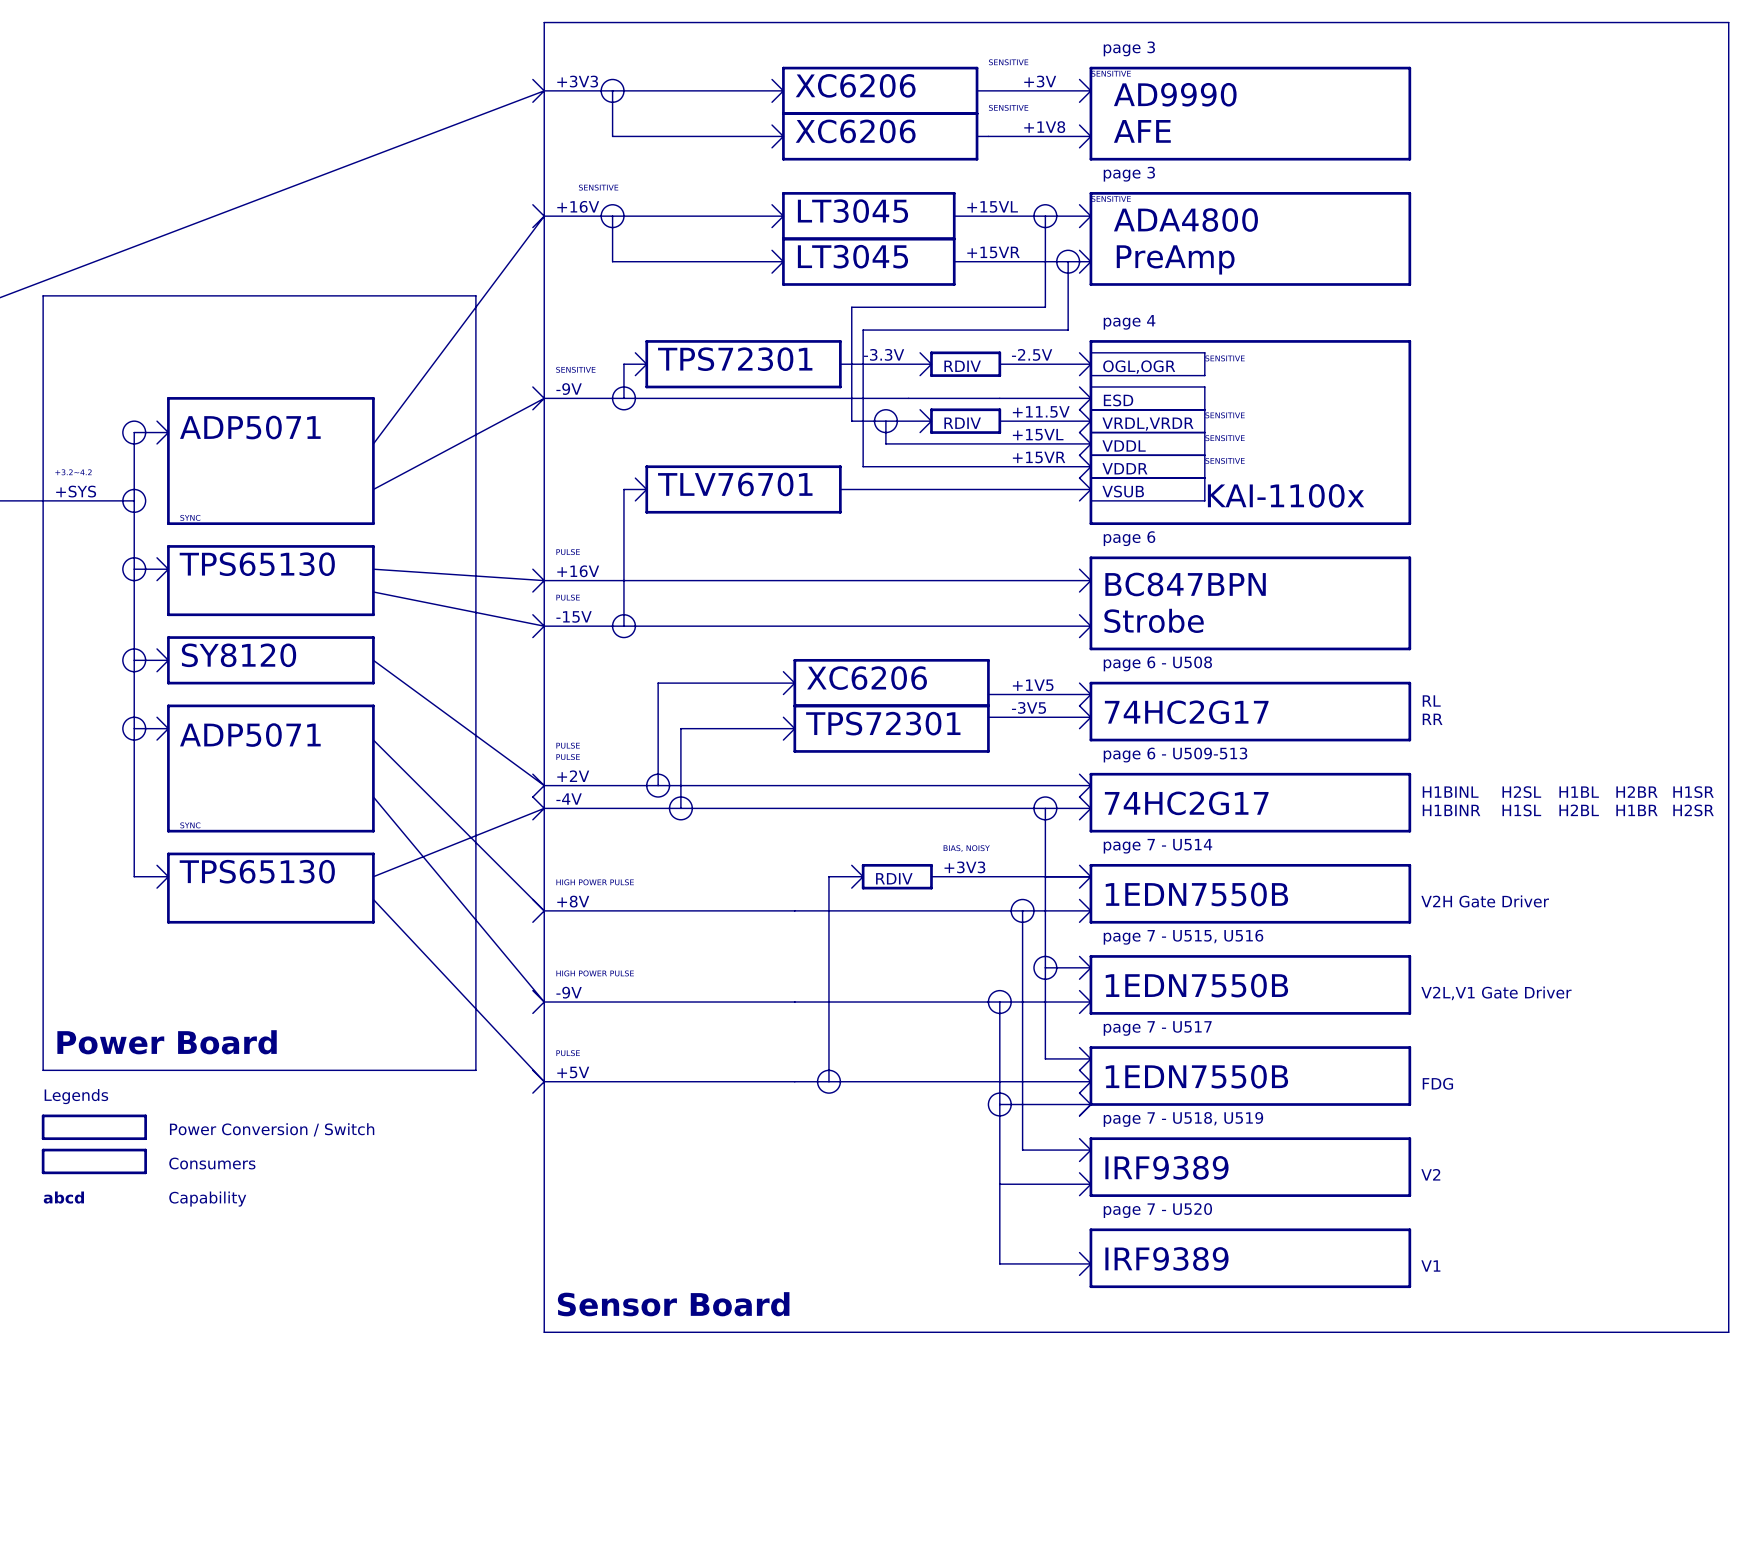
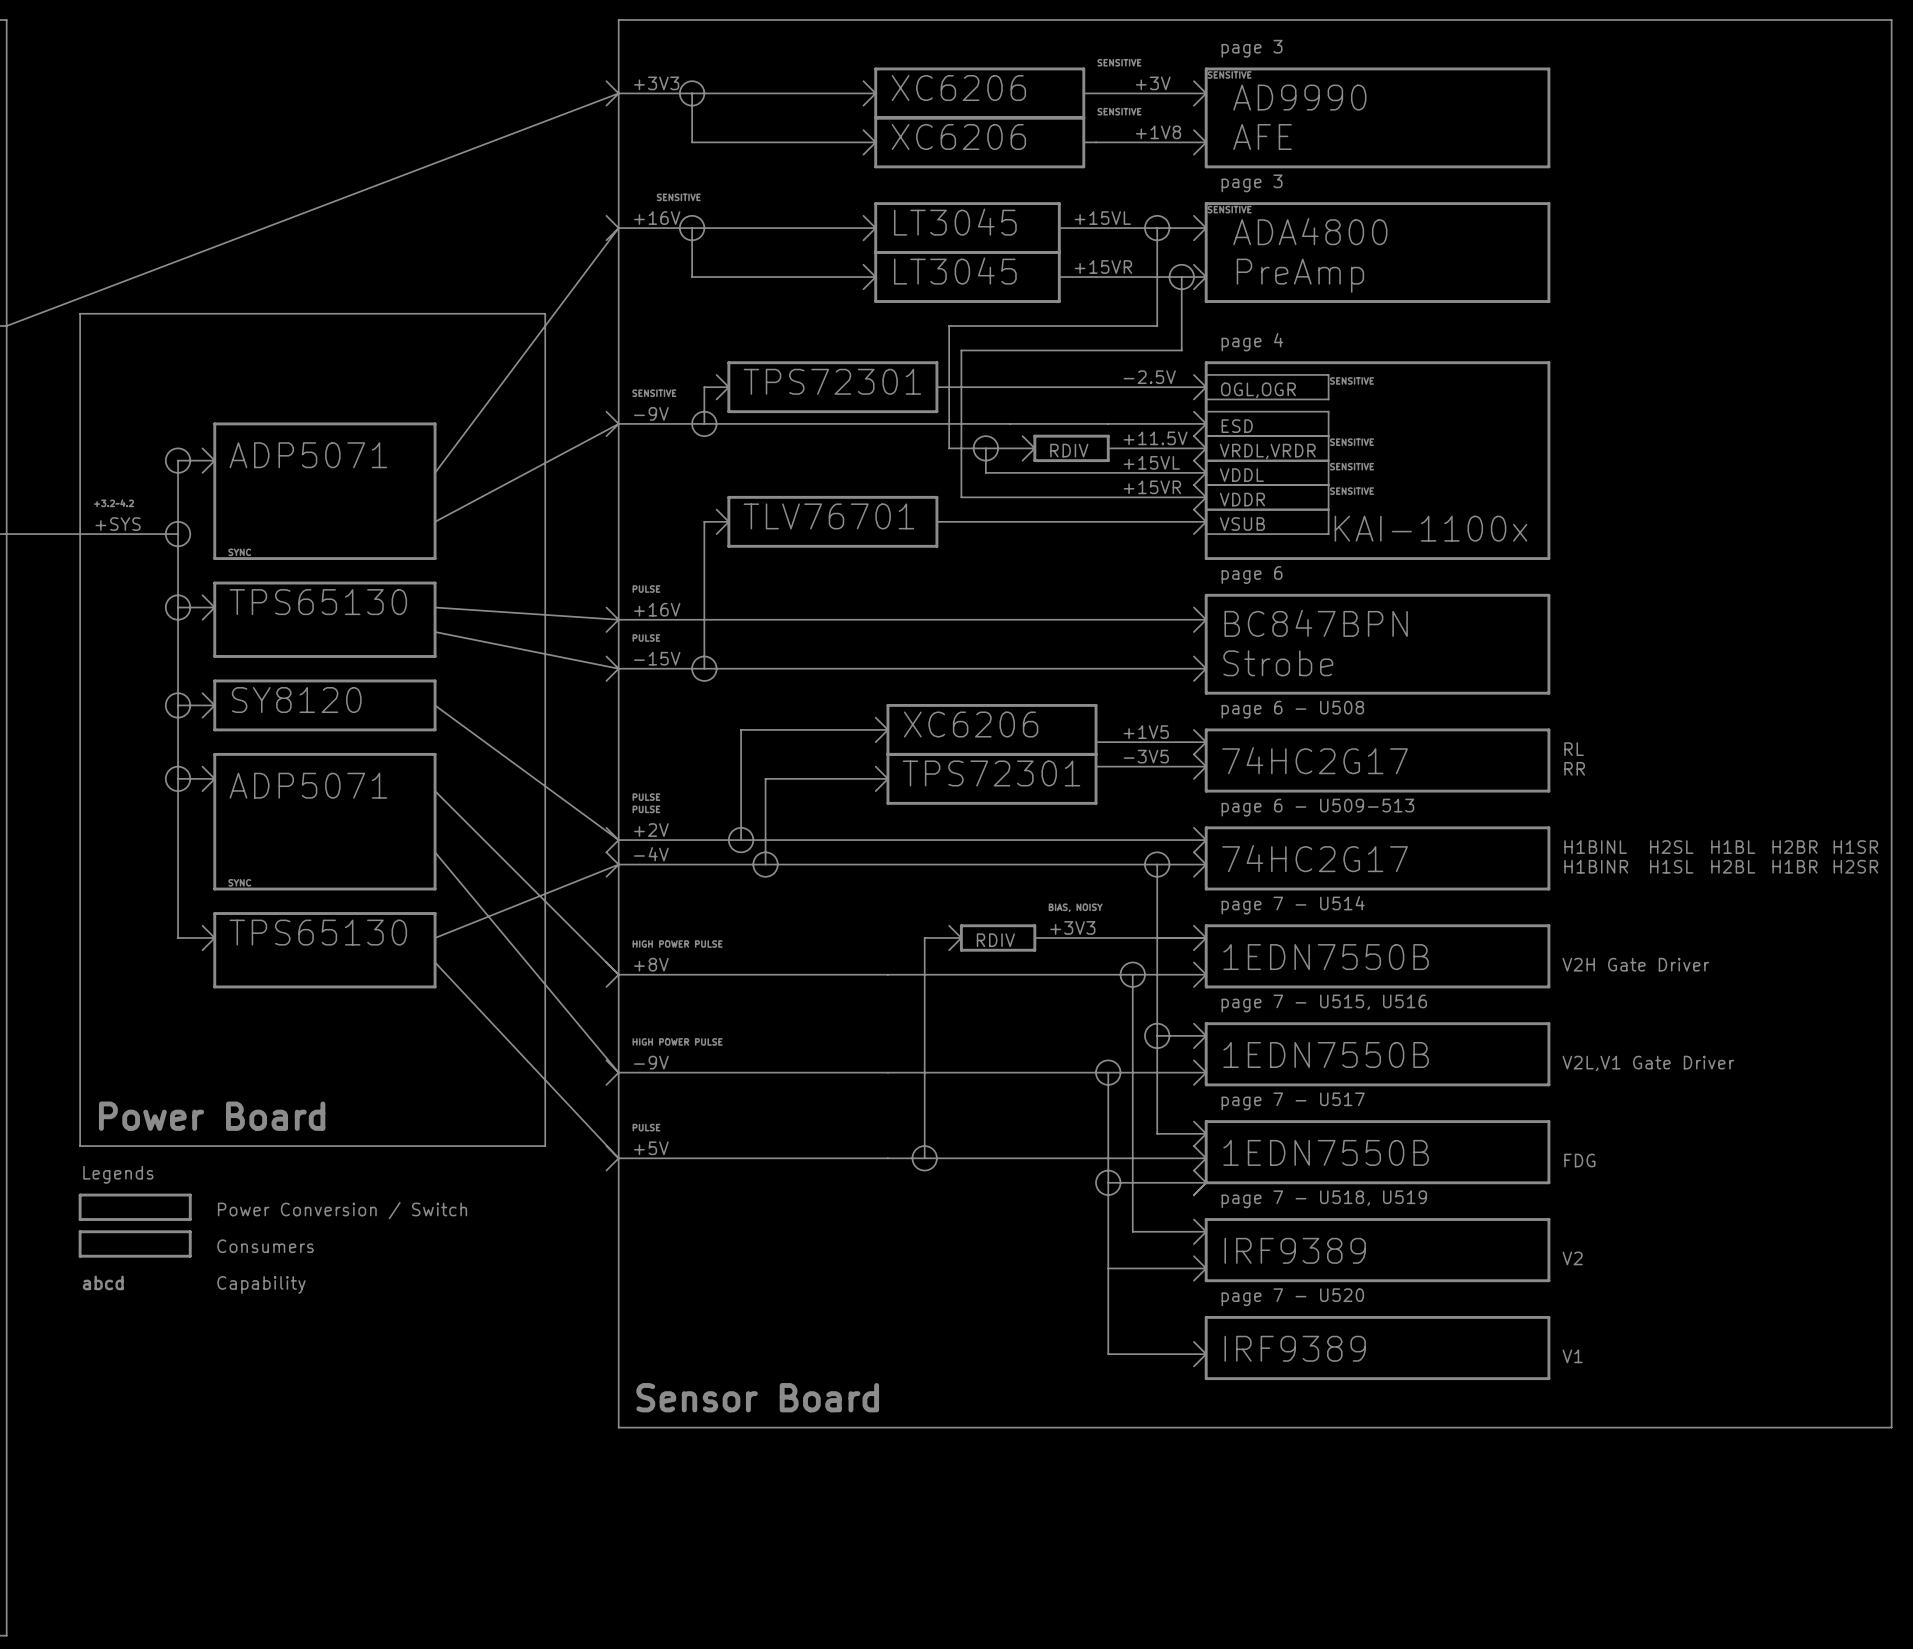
line: (920, 352) (931, 364) (920, 375) -> none
line: (931, 352) (999, 352) (999, 375) (931, 375) (931, 352) -> none
text: -3.3V (884, 354) -> none
line: none -> (1034, 387) (1108, 387)
text: RDIV (962, 366) -> none

